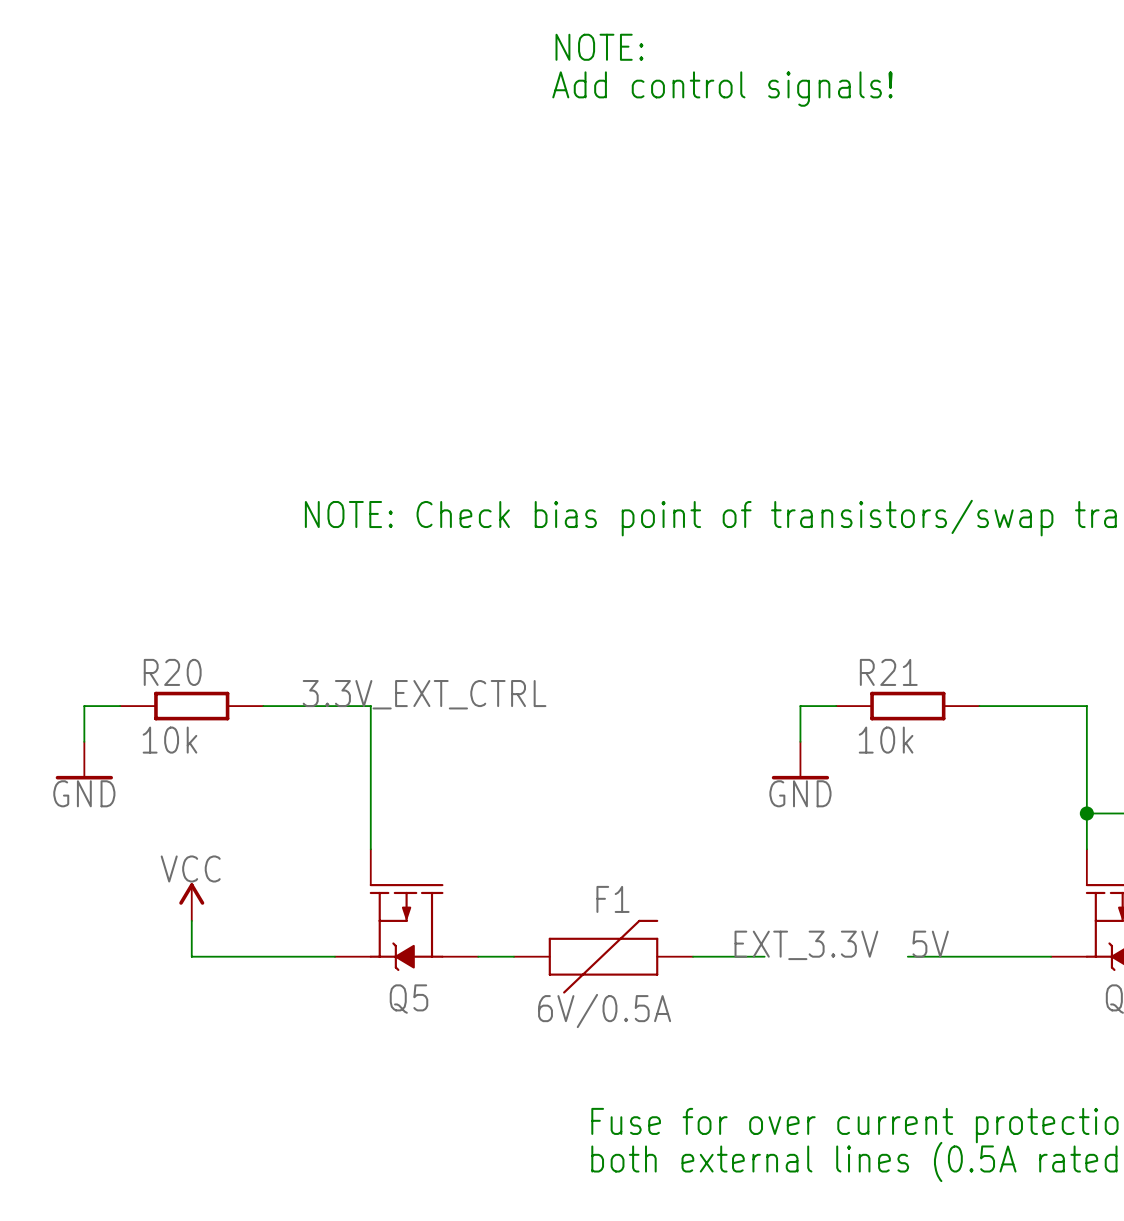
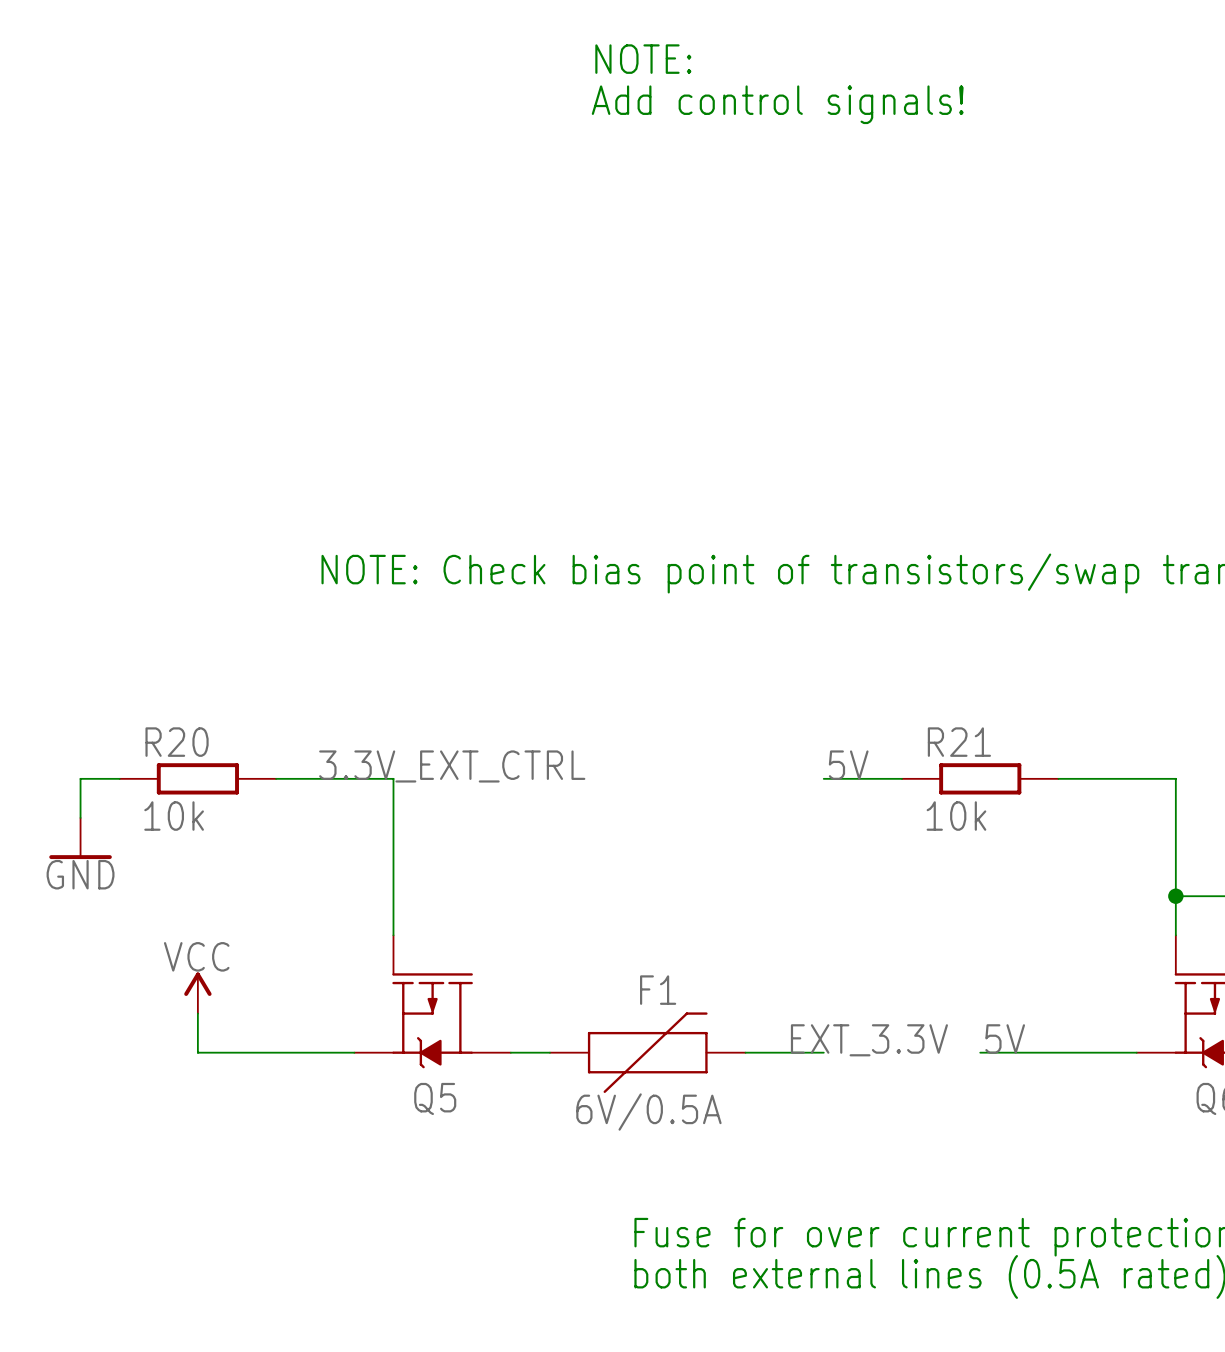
label: none -> 5V (848, 765)
wire: (800, 706) (800, 741) -> (862, 778) (823, 778)
power symbol: GND (800, 760) -> none

